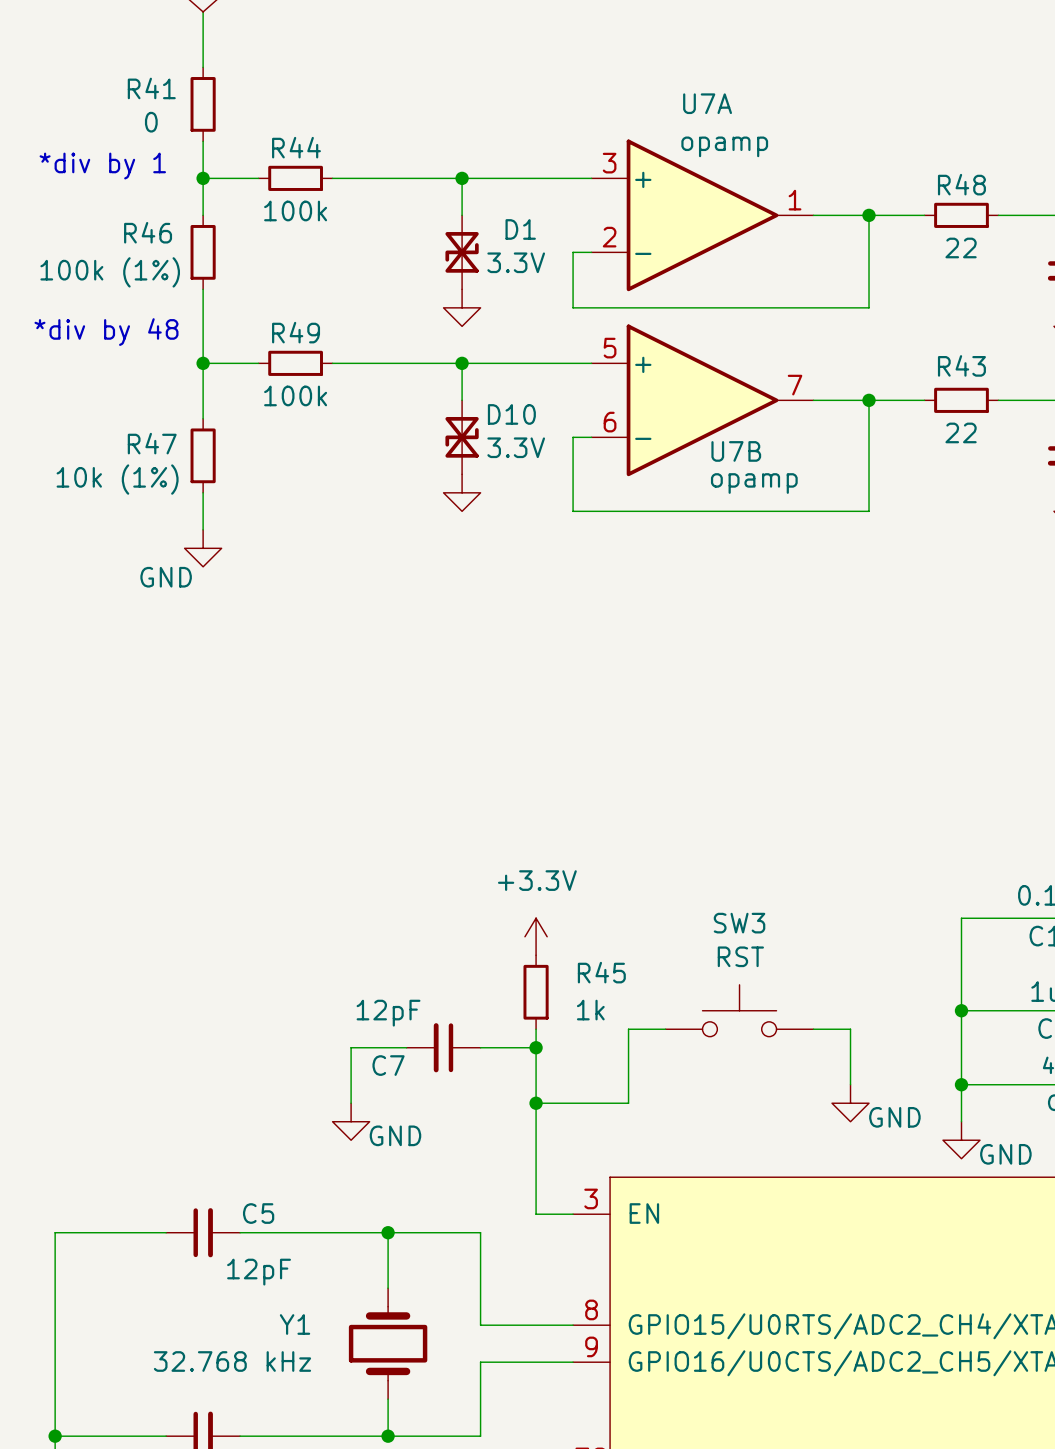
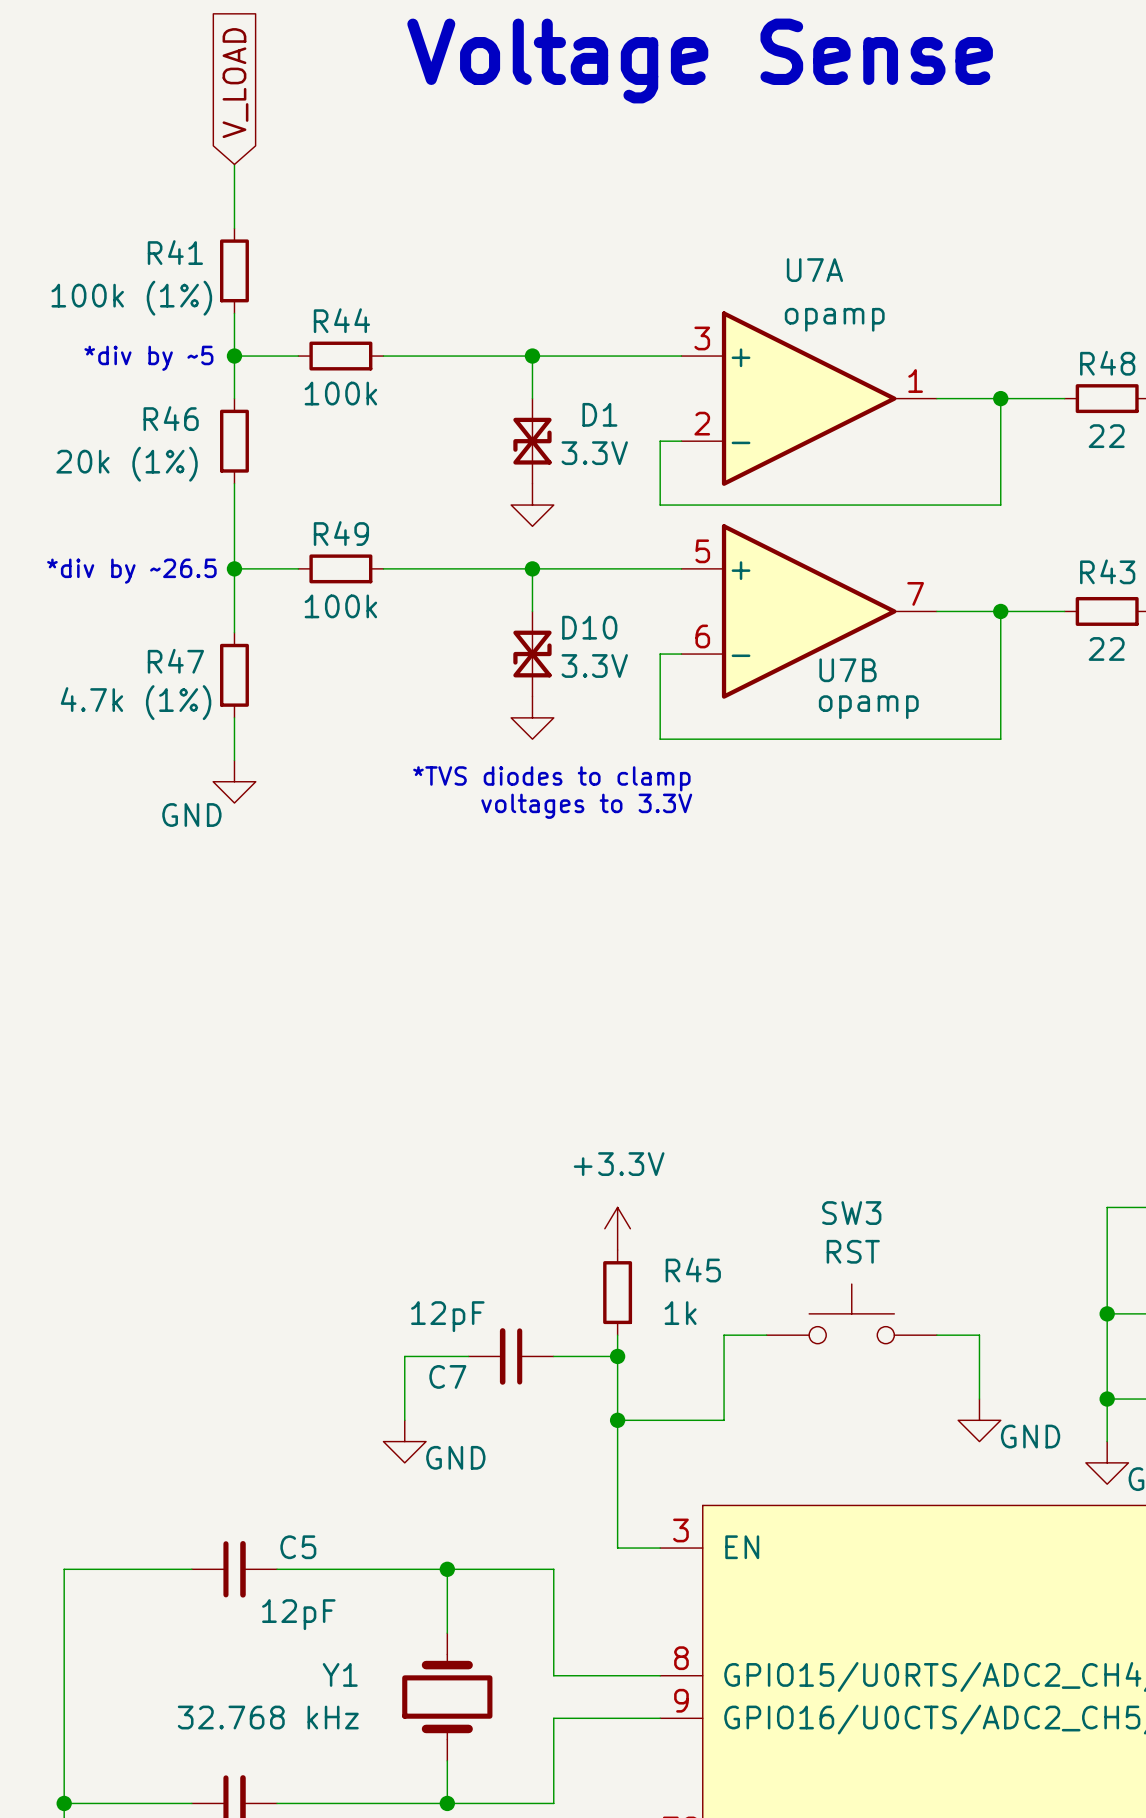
R41 value: 0 (151, 122) -> 100k (1%) (131, 298)
text: *div by 1 (102, 166) -> *div by ~5 (148, 358)
R46 value: 100k (1%) (110, 272) -> 20k (1%) (127, 464)
text: *div by 48 (106, 332) -> *div by ~26.5 (131, 571)
R47 value: 10k (1%) (117, 479) -> 4.7k (1%) (136, 702)
text: none -> *TVS diodes to clamp (551, 778)
text: none -> voltages to 3.3V (586, 806)

